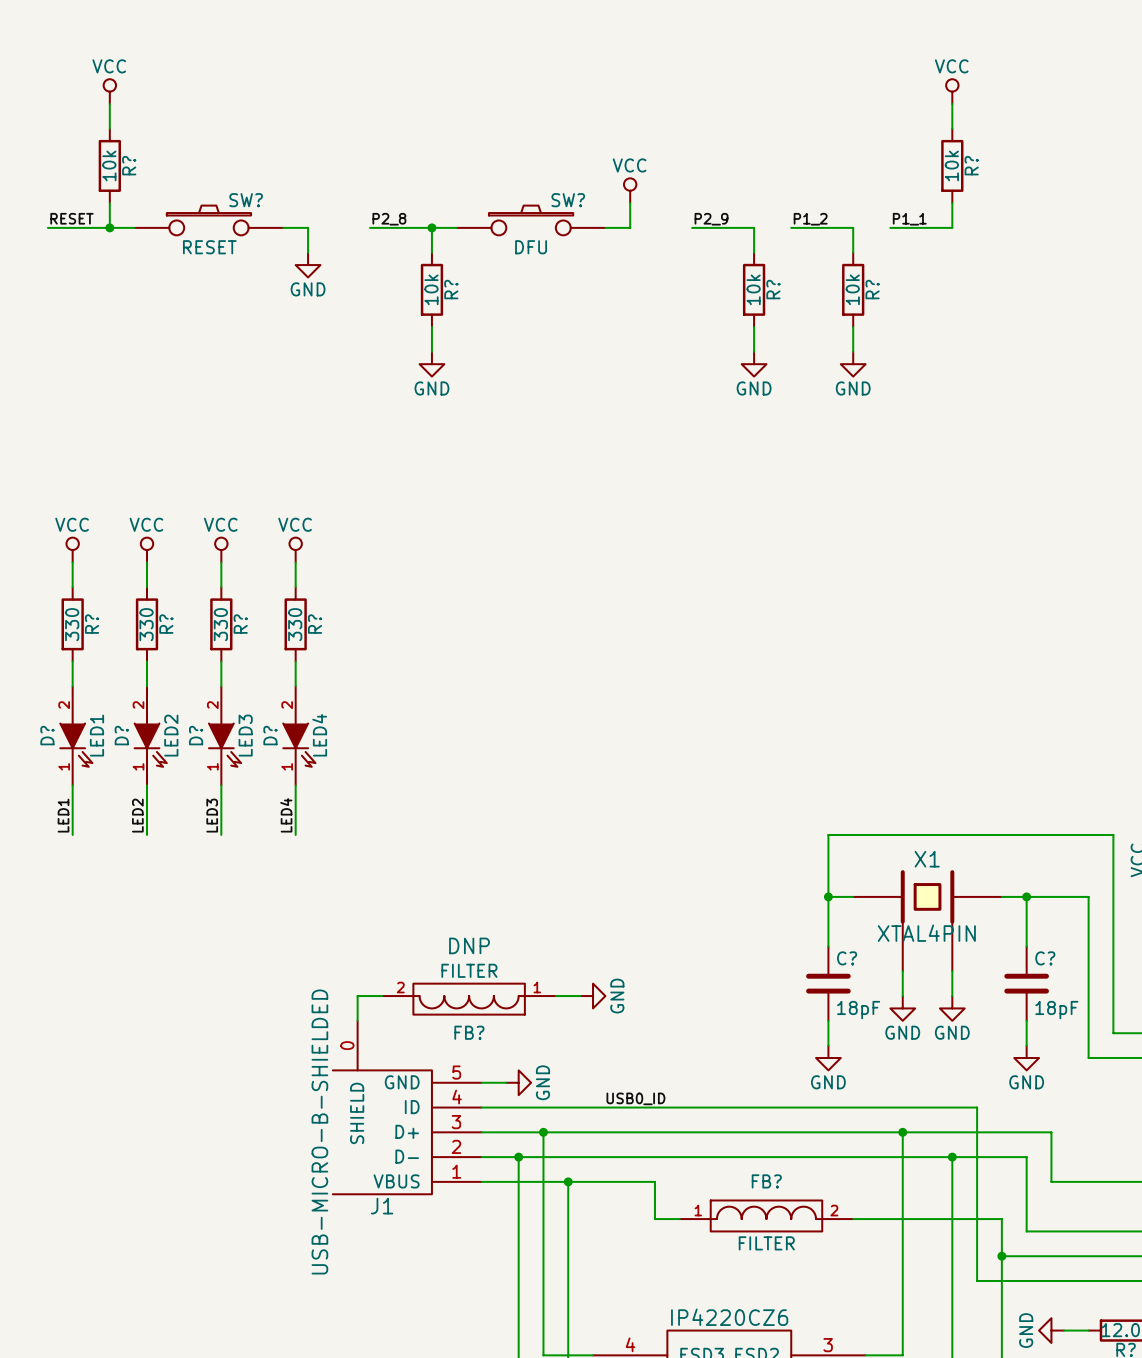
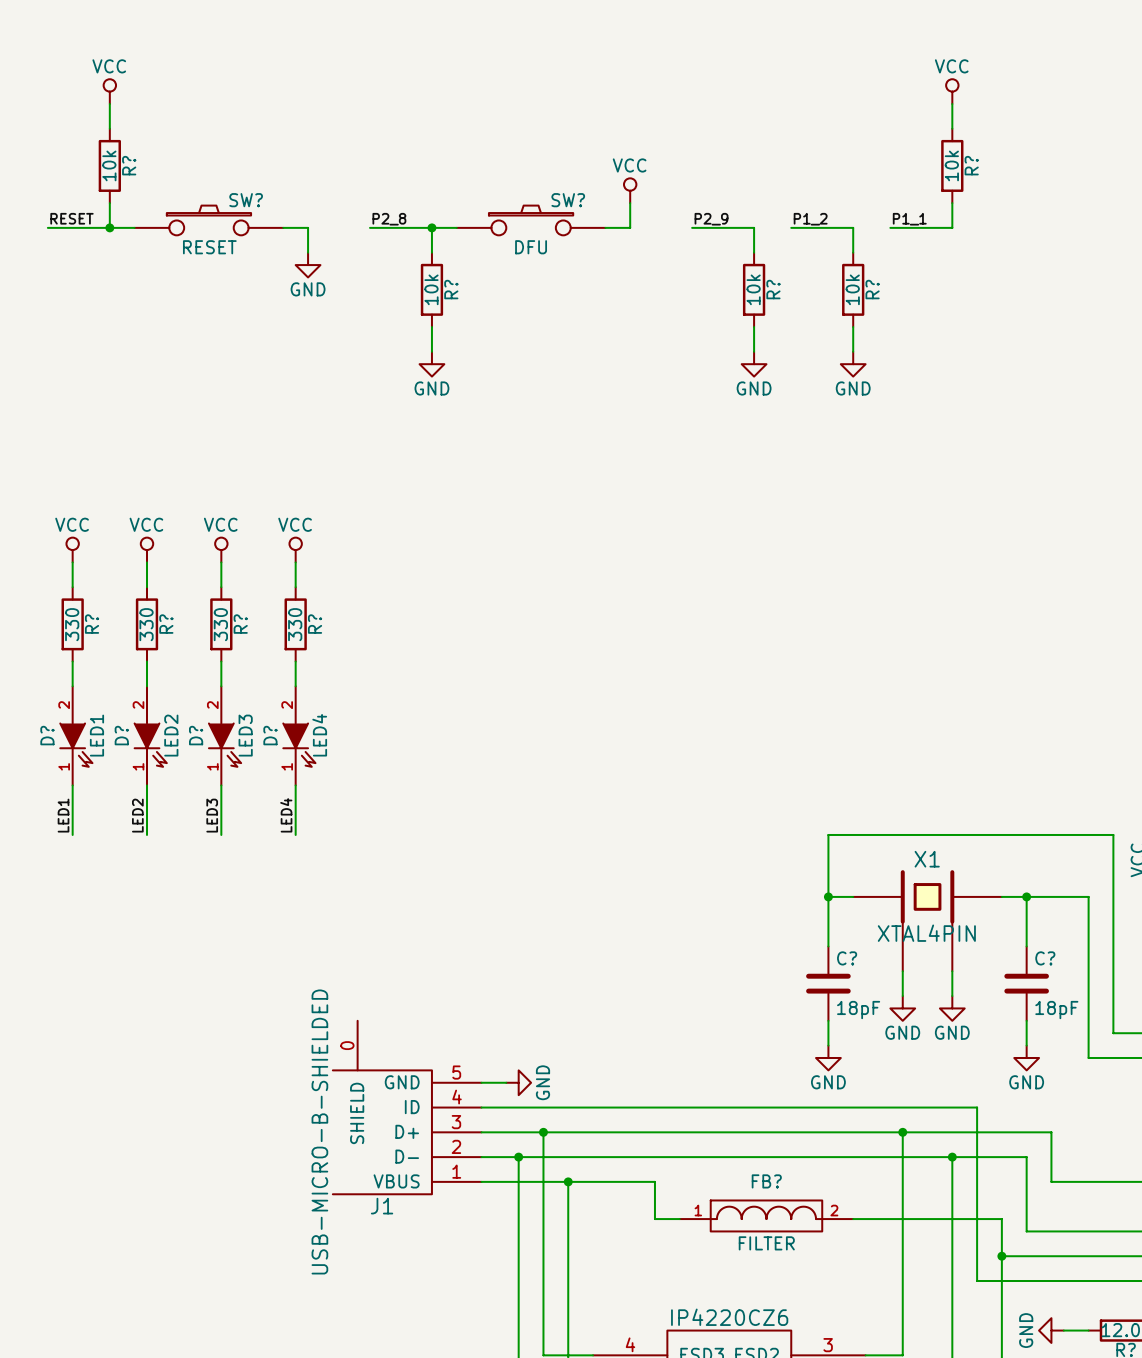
wire: (382, 996) (357, 996) (357, 1020) -> none
wire: (555, 996) (580, 996) -> none
power symbol: GND (593, 996) -> none
FB?: FILTER (469, 999) -> none
label: USB0_ID (635, 1098) -> none

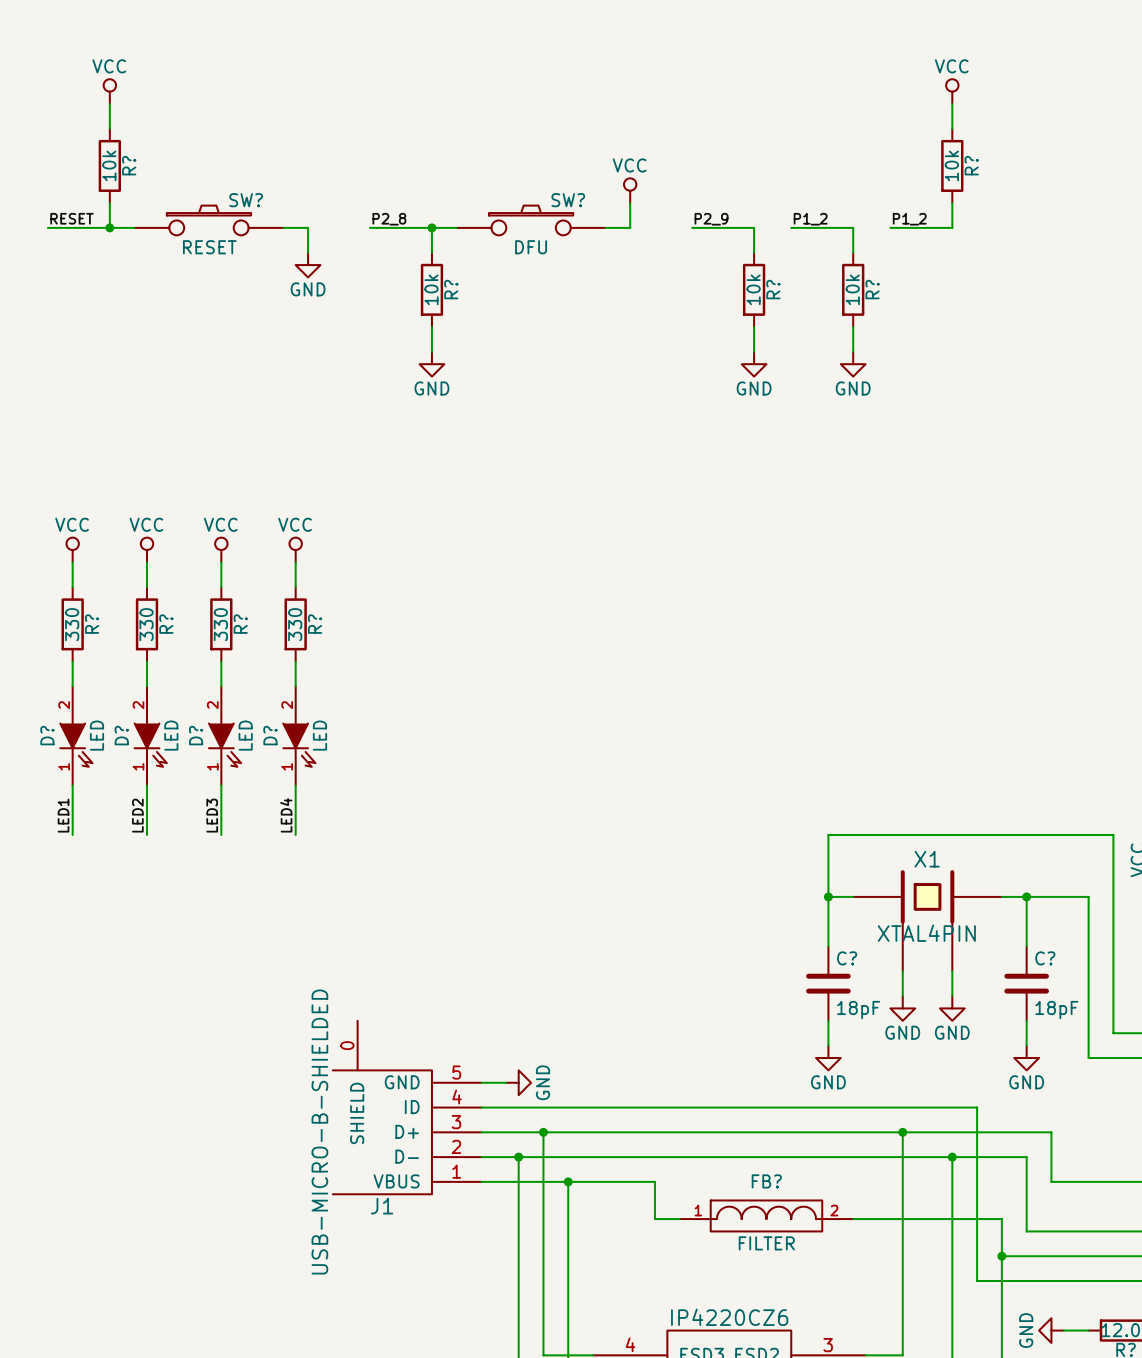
label: P1_1 (909, 219) -> P1_2 (909, 219)
D? value: LED1 (96, 735) -> LED (96, 735)
D? value: LED2 (171, 735) -> LED (171, 735)
D? value: LED3 (245, 735) -> LED (245, 735)
D? value: LED4 (319, 735) -> LED (319, 735)

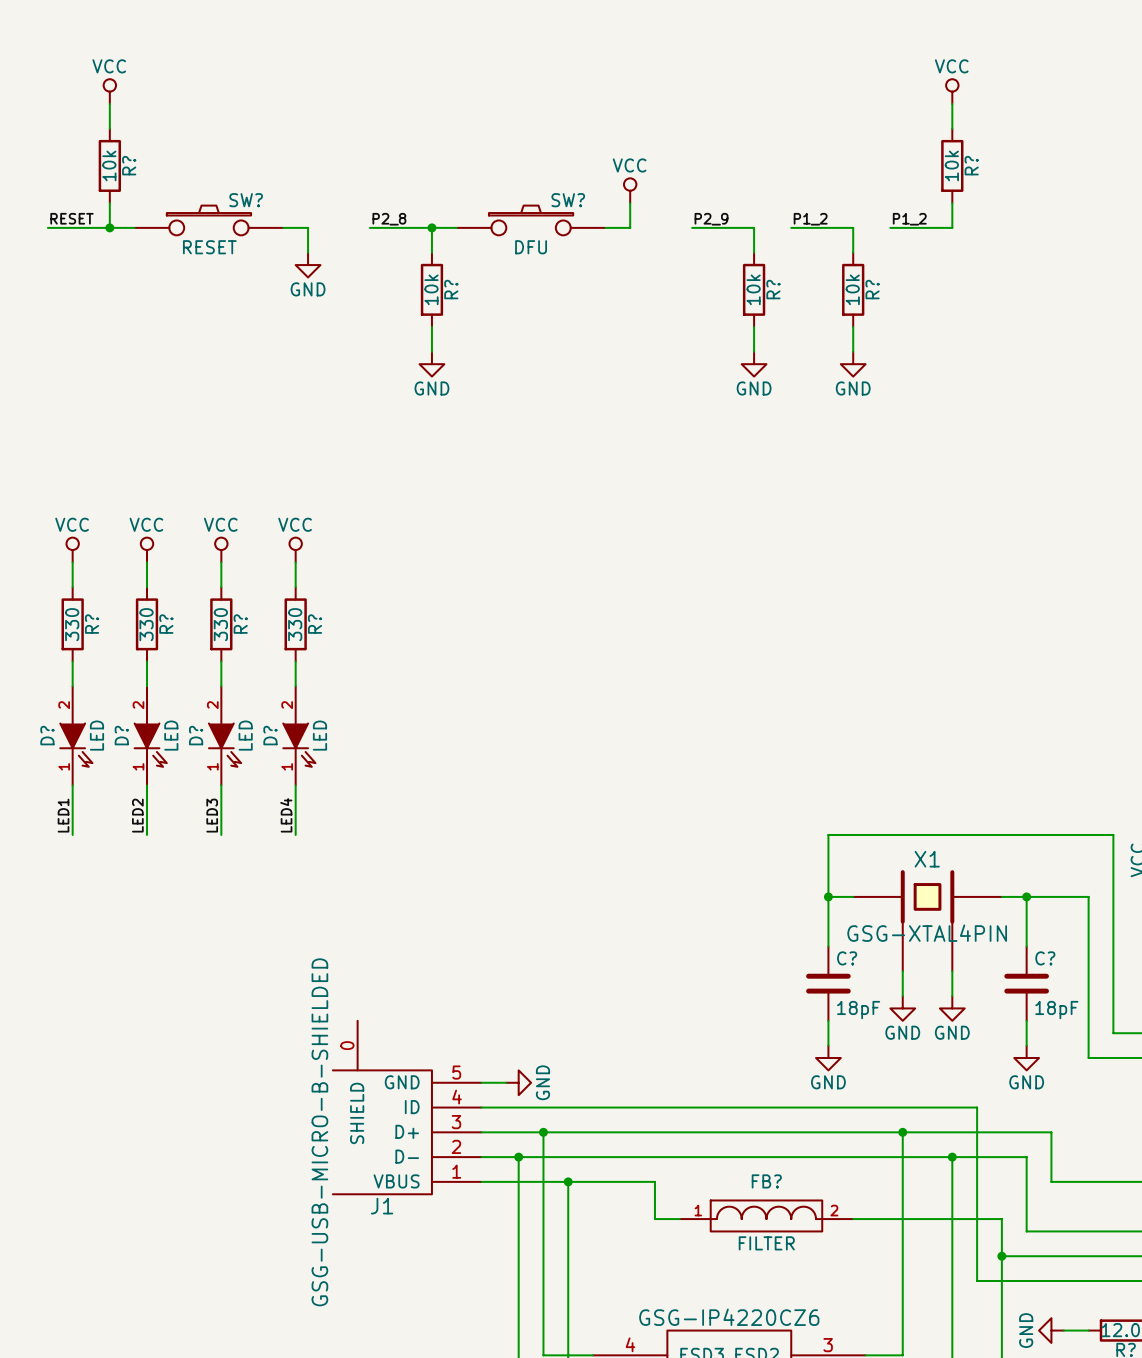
X1 value: XTAL4PIN (926, 933) -> GSG-XTAL4PIN (927, 933)
J1 value: USB-MICRO-B-SHIELDED (319, 1131) -> GSG-USB-MICRO-B-SHIELDED (319, 1132)
part value: IP4220CZ6 (729, 1317) -> GSG-IP4220CZ6 (729, 1317)

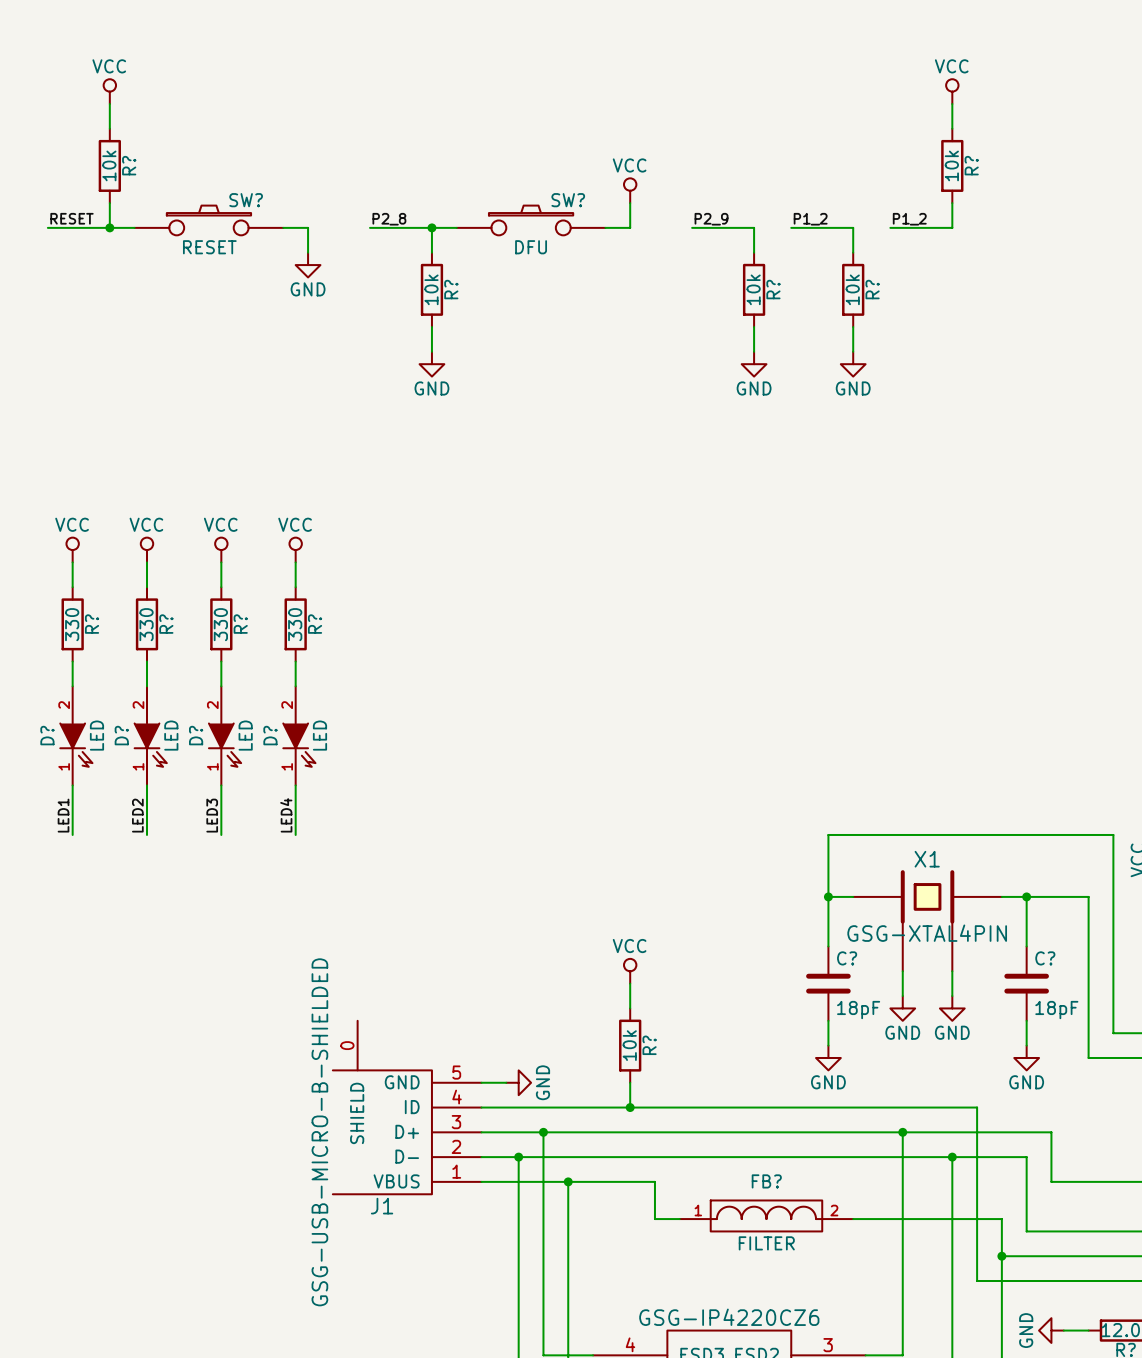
power symbol: none -> VCC (630, 971)
wire: none -> (630, 983) (630, 1008)
R?: none -> 10k (630, 1045)
wire: none -> (630, 1082) (630, 1107)
junction: none -> (630, 1107)

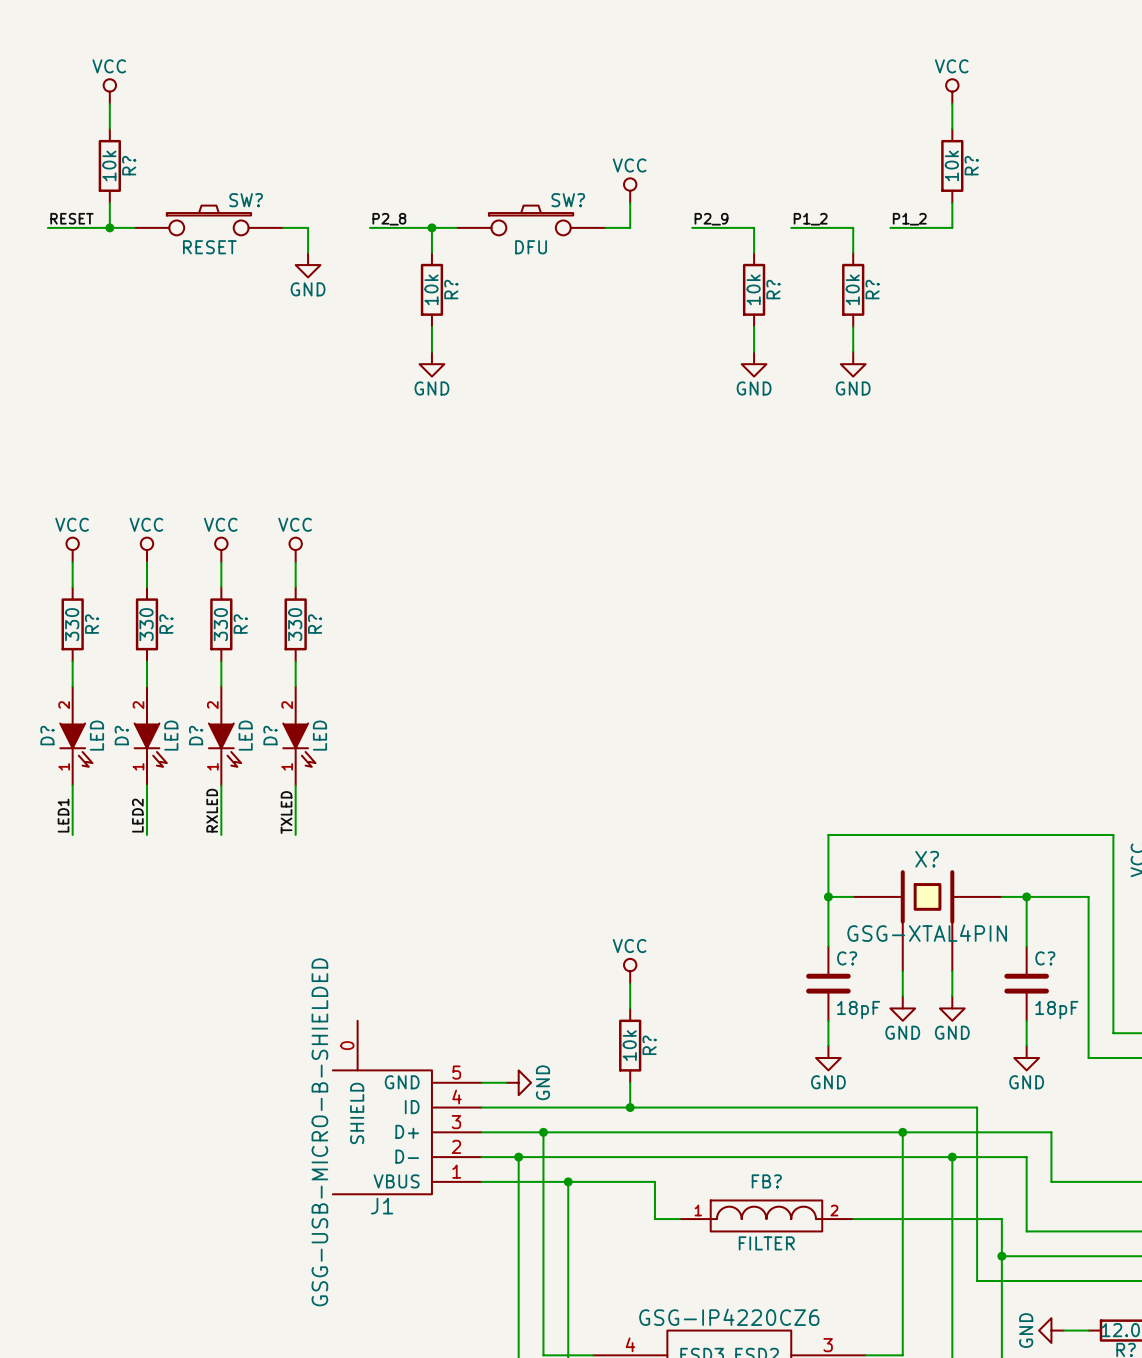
label: LED3 (212, 815) -> RXLED (212, 810)
label: LED4 (286, 815) -> TXLED (286, 812)
X1 name: X1 (927, 859) -> X? (927, 859)

